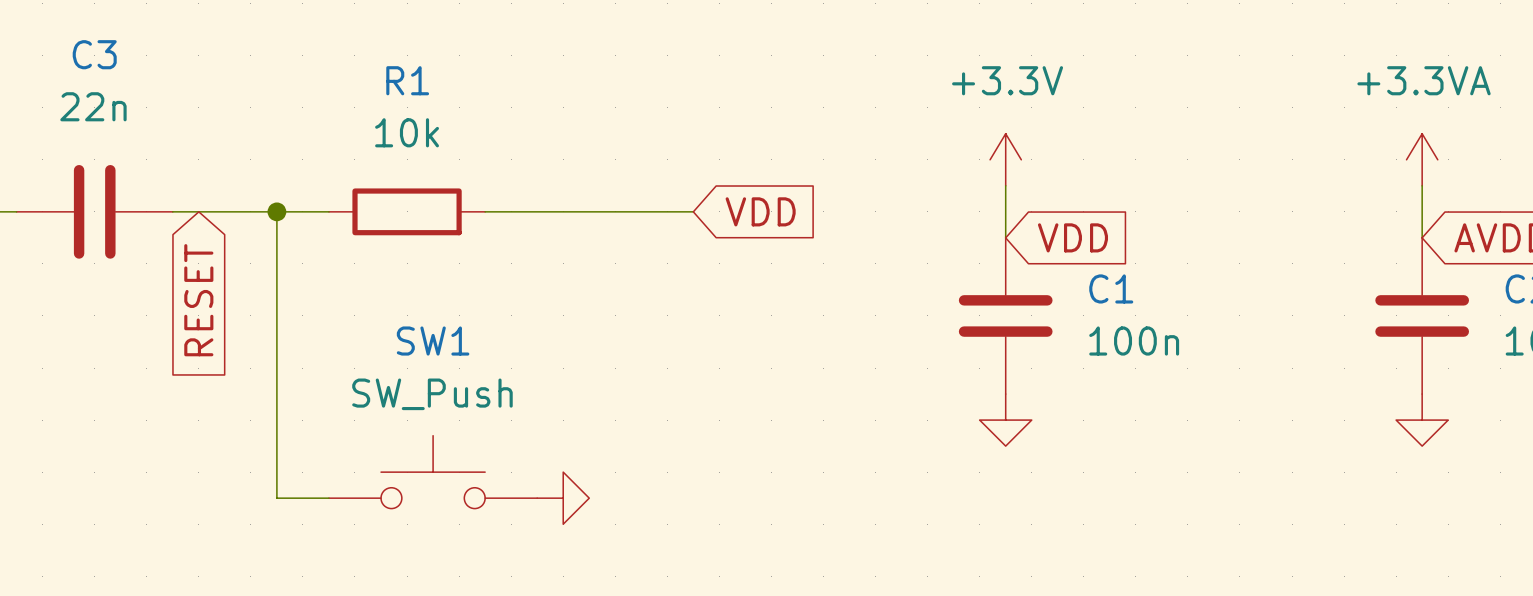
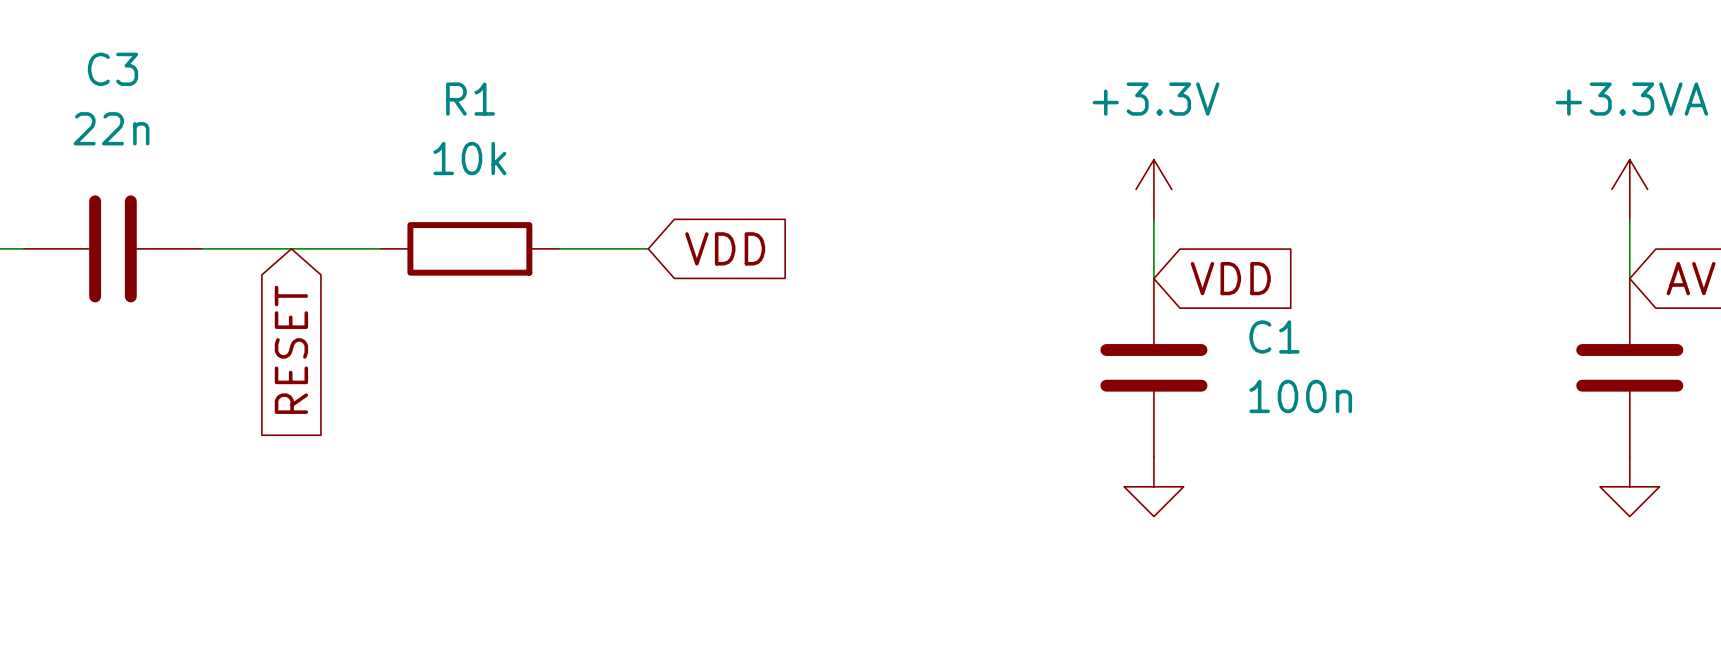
wire: (276, 211) (276, 498) (328, 498) -> none
junction: (276, 211) -> none
wire: (563, 211) (693, 211) -> none
global label position: VDD (760, 211) -> VDD (725, 248)
global label position: RESET (198, 300) -> RESET (291, 349)
SW1: SW_Push (433, 472) -> none
power symbol: (563, 498) -> none

